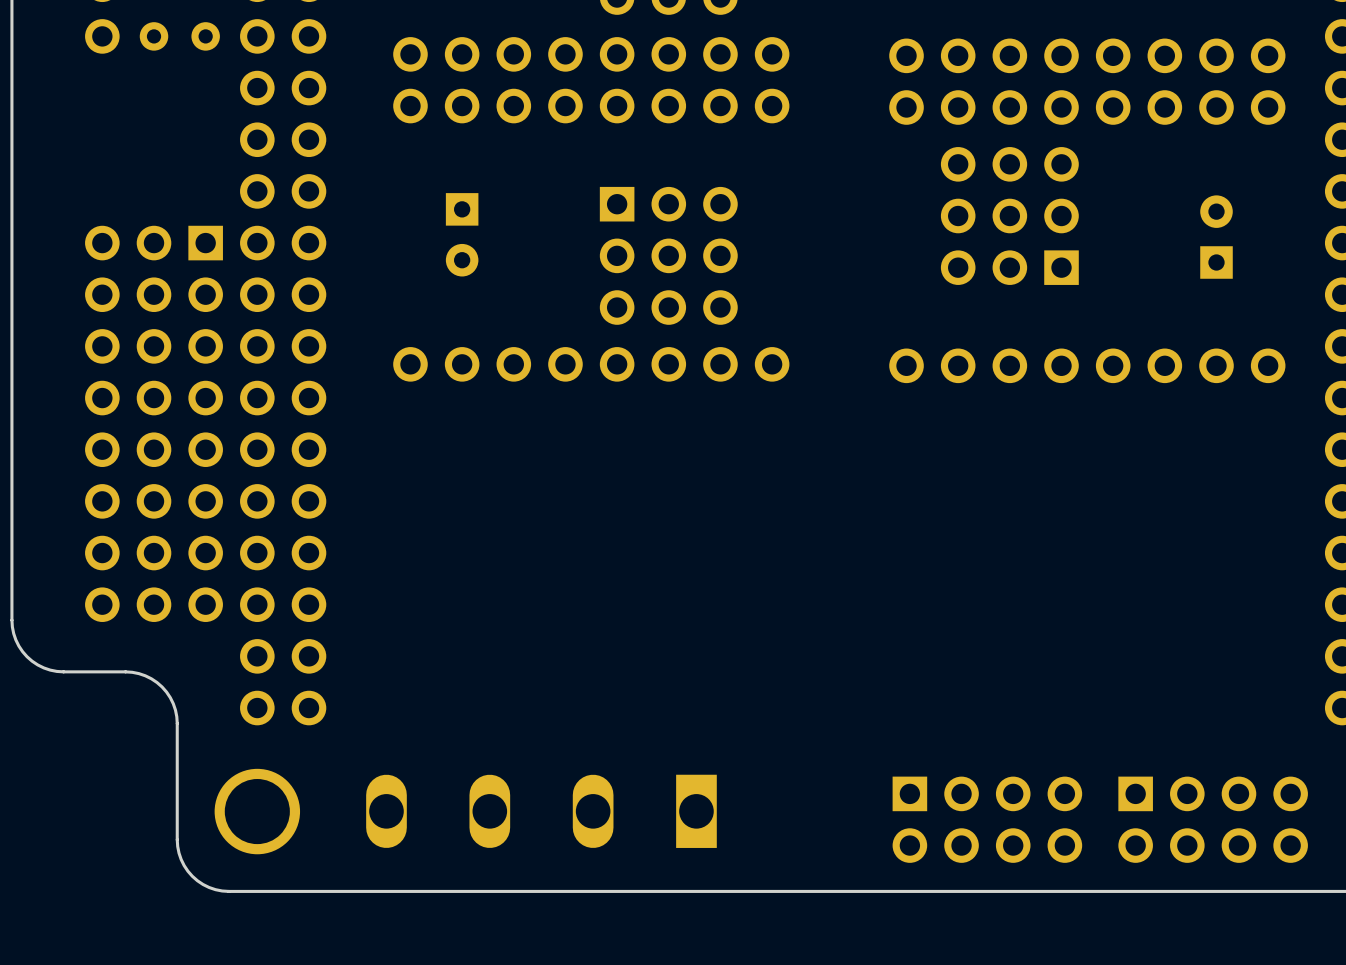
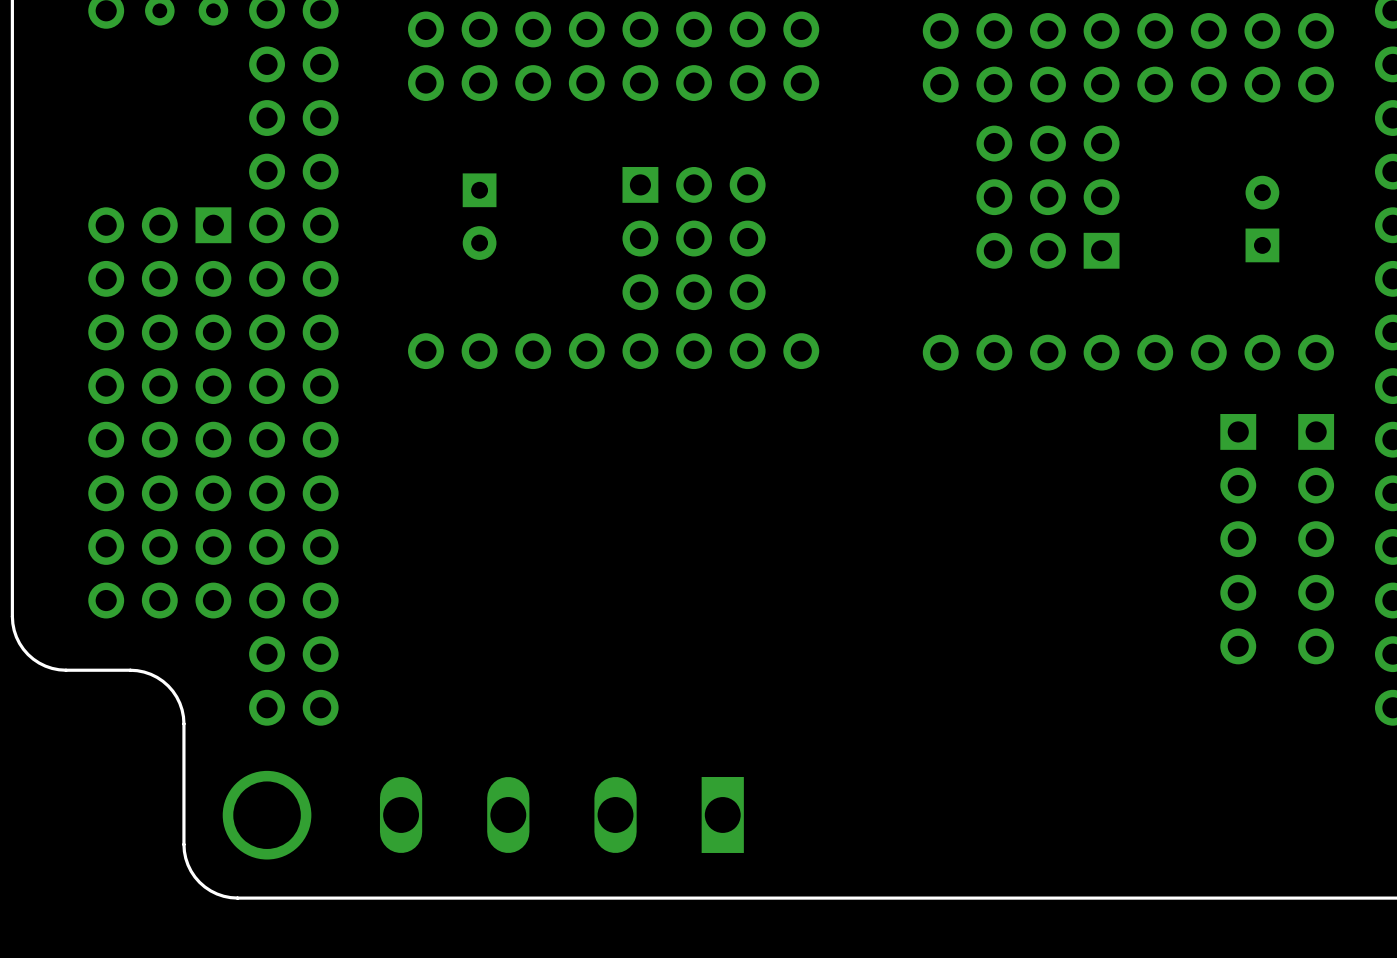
part: none -> (1238, 539)
part: none -> (1316, 539)
part: (987, 819) -> none
part: (1213, 819) -> none

